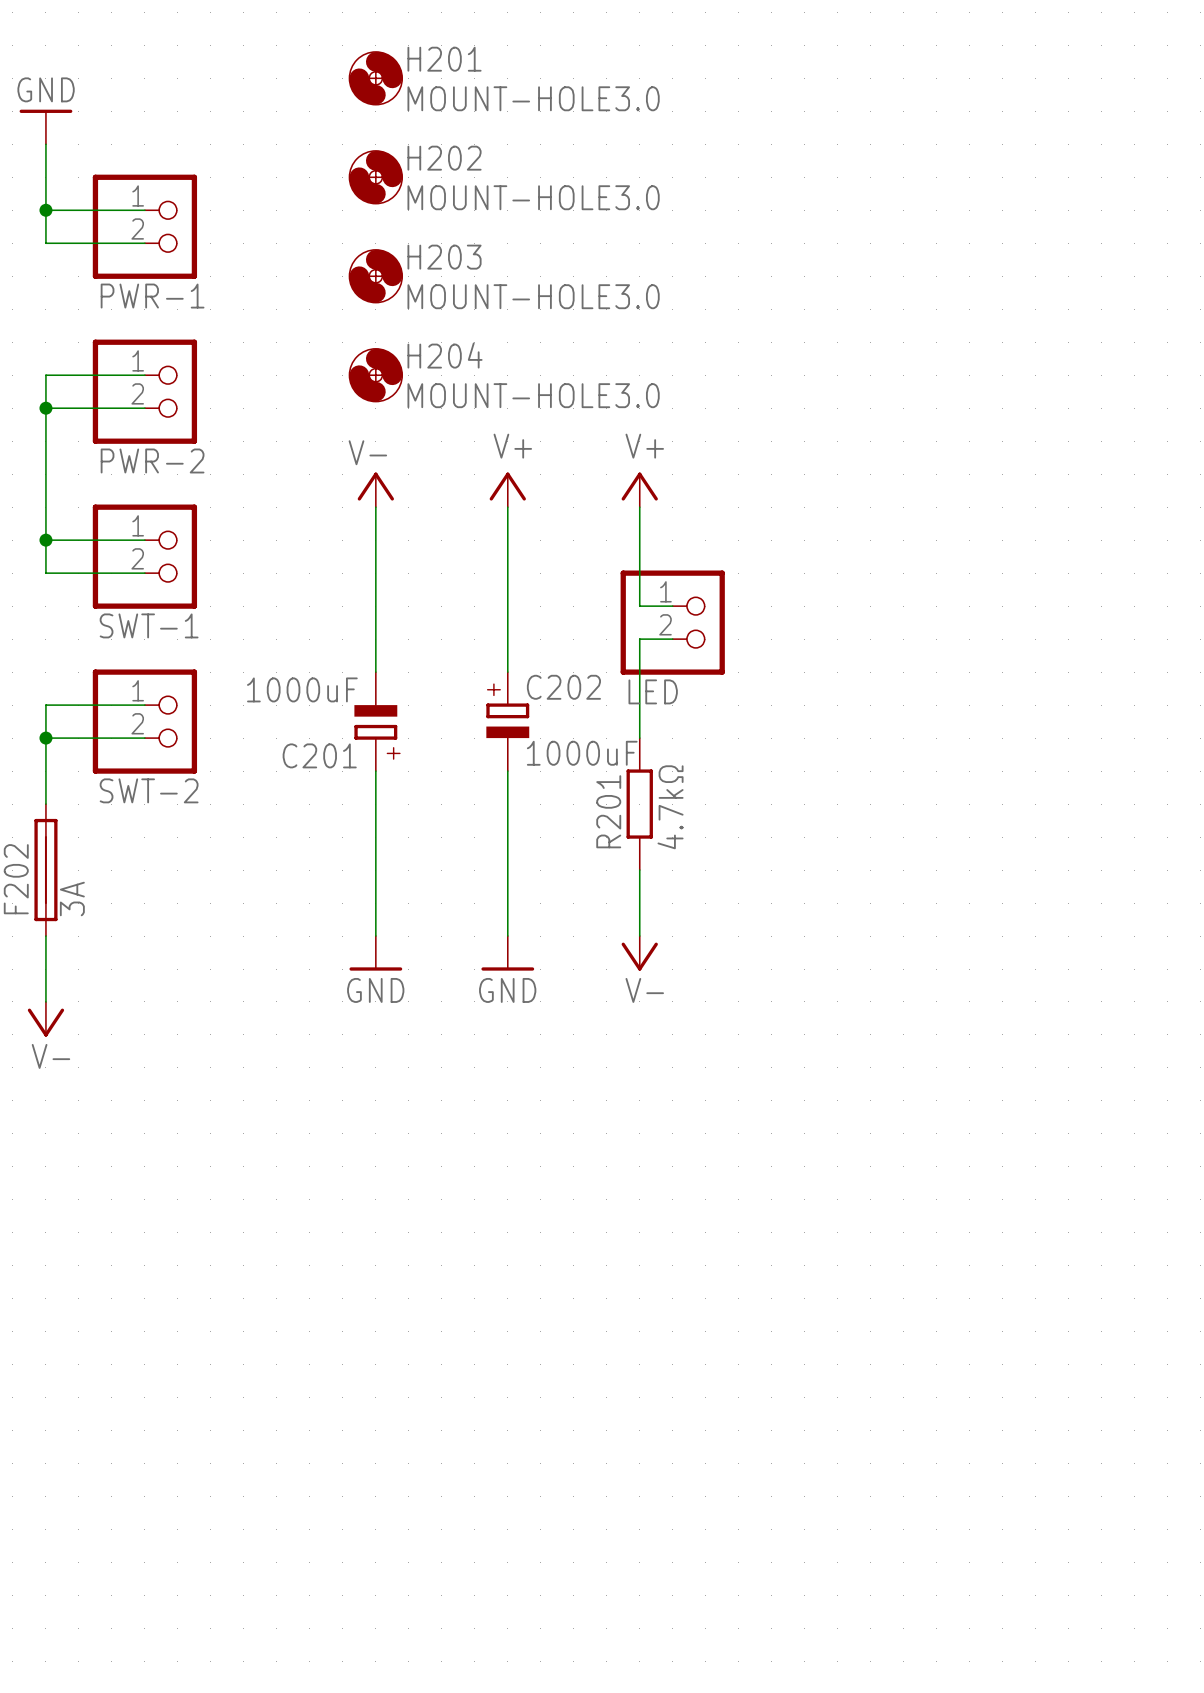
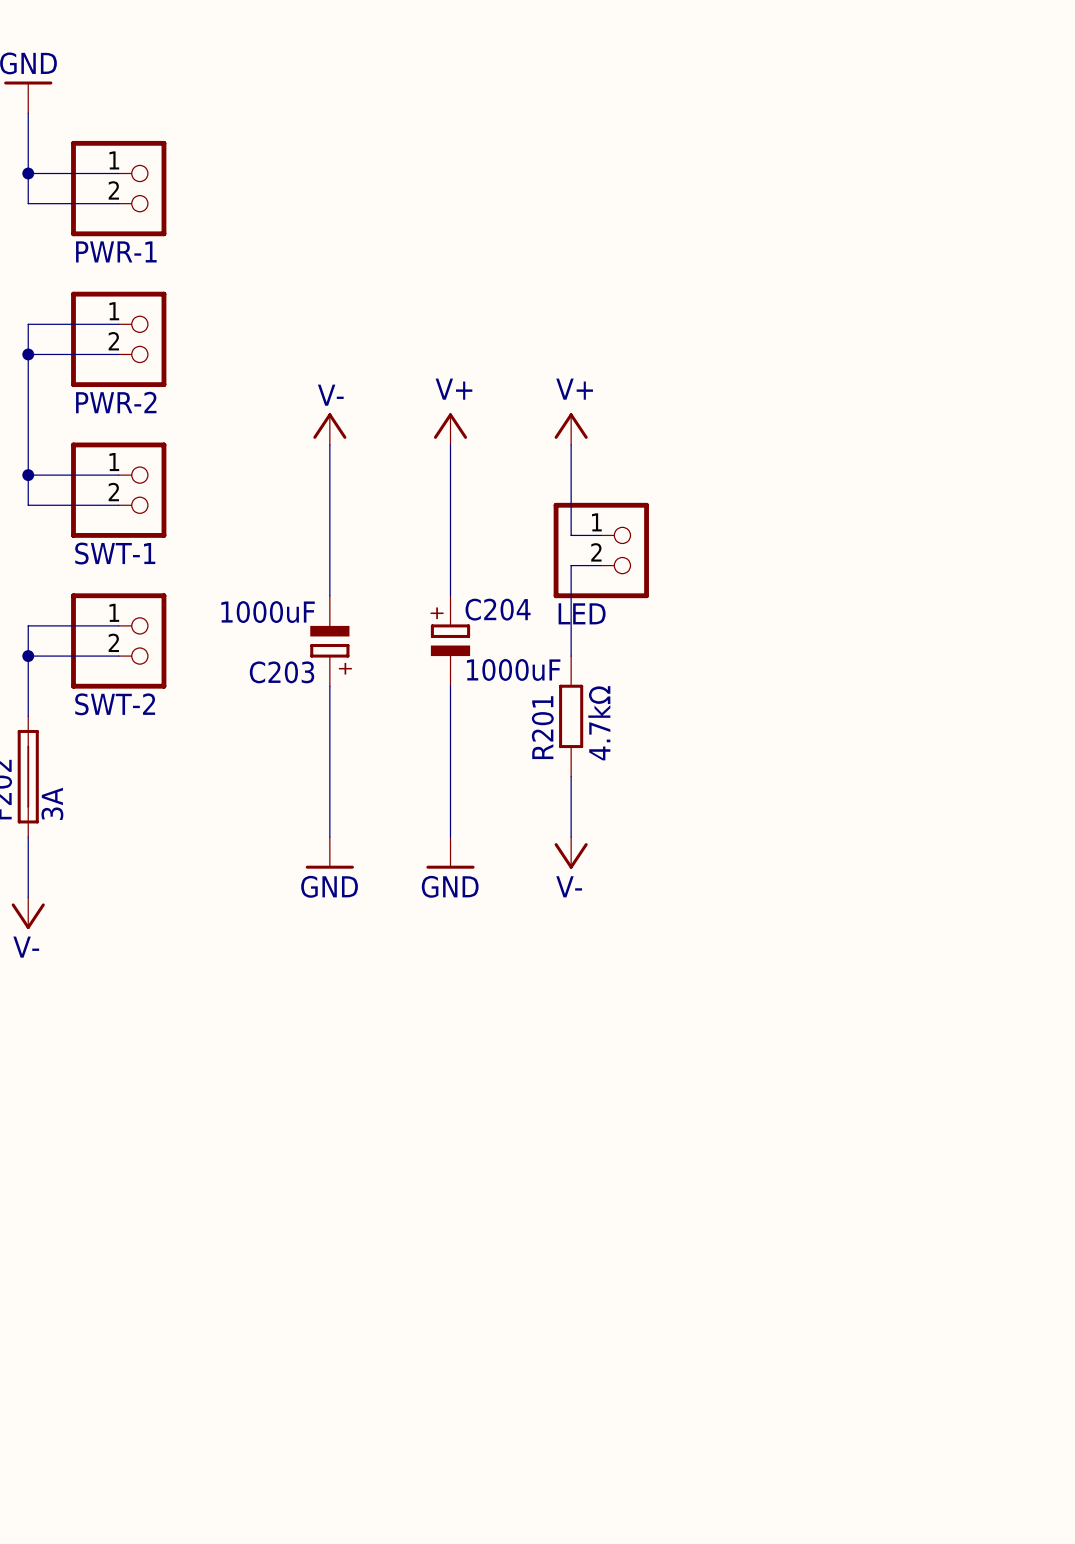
H201: MOUNT-HOLE3.0 (375, 78) -> none
H202: MOUNT-HOLE3.0 (375, 177) -> none
H203: MOUNT-HOLE3.0 (375, 276) -> none
H204: MOUNT-HOLE3.0 (375, 375) -> none
C202 name: C202 (563, 687) -> C204 (498, 609)
C201 name: C201 (319, 755) -> C203 (282, 672)

